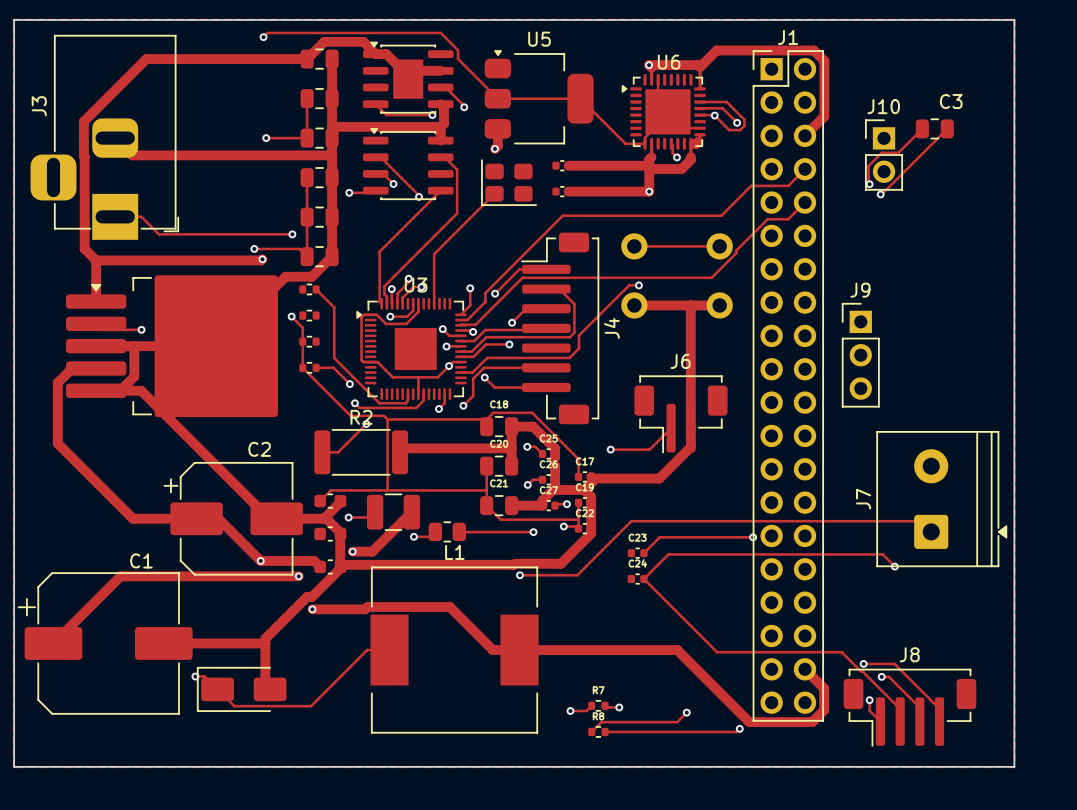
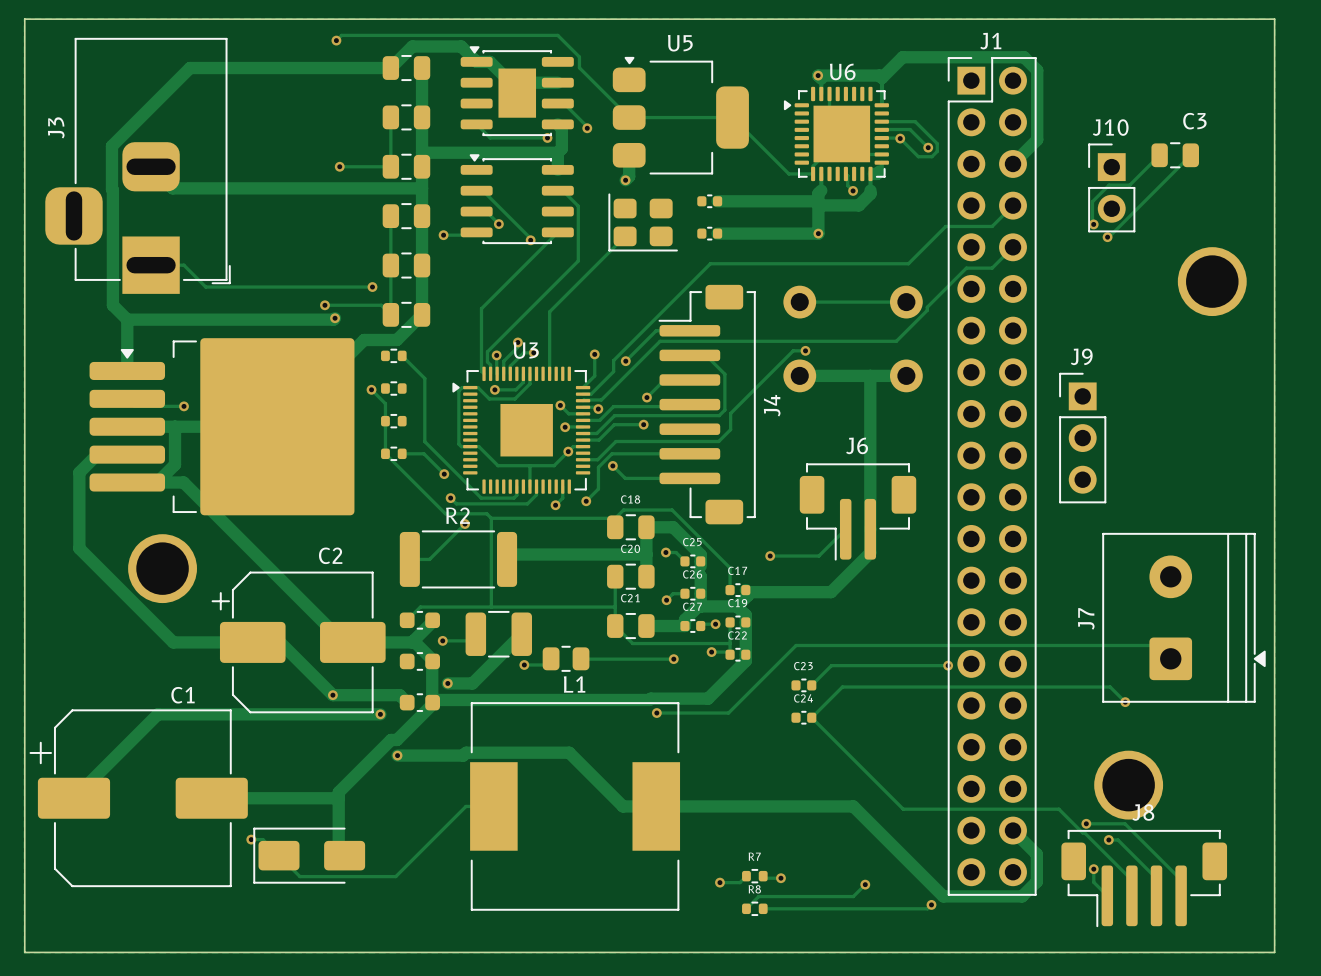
part: none -> (1212, 281)
part: none -> (162, 568)
part: none -> (1128, 785)

